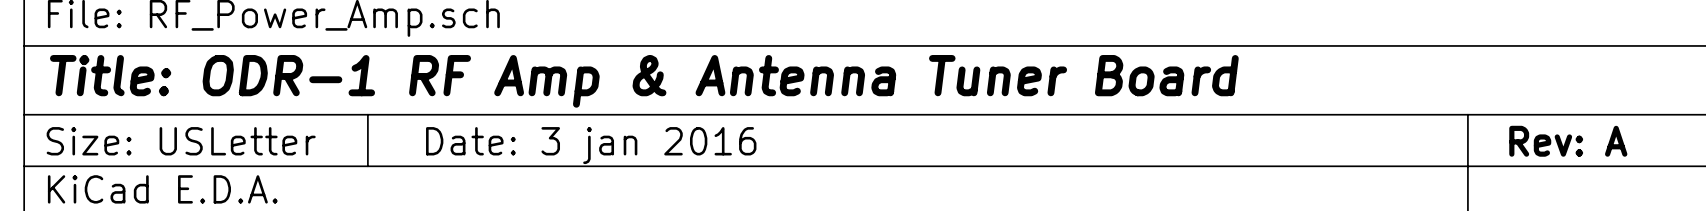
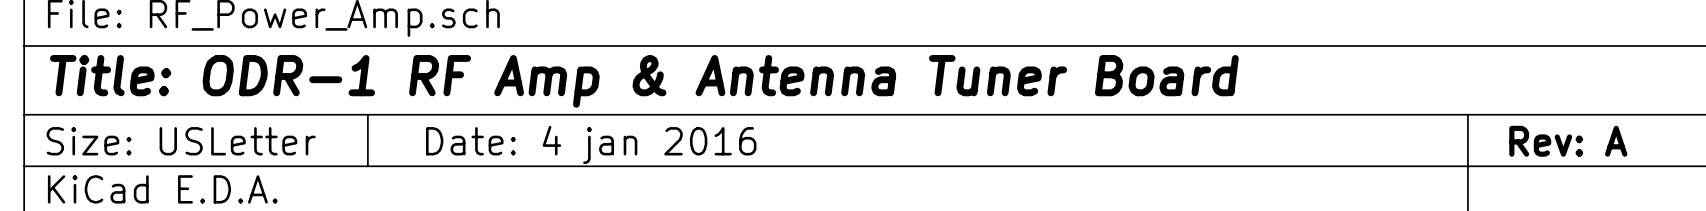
title block: Date: 3 jan 2016 (591, 145) -> Date: 4 jan 2016 (591, 144)

